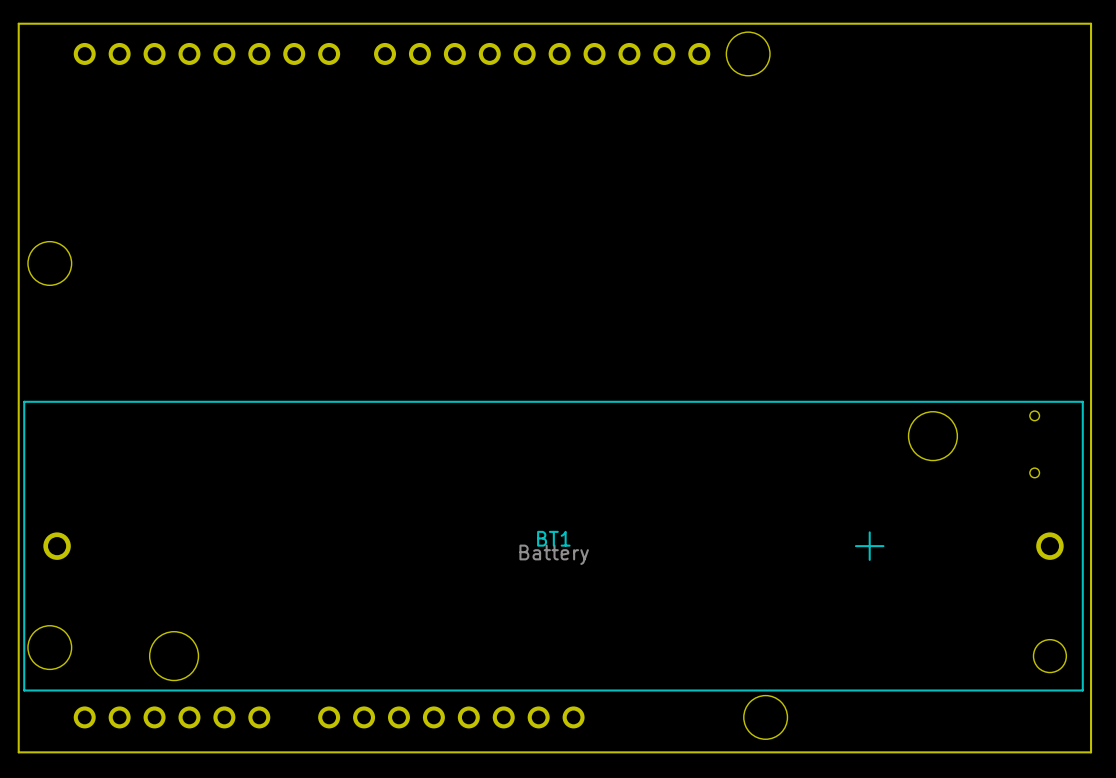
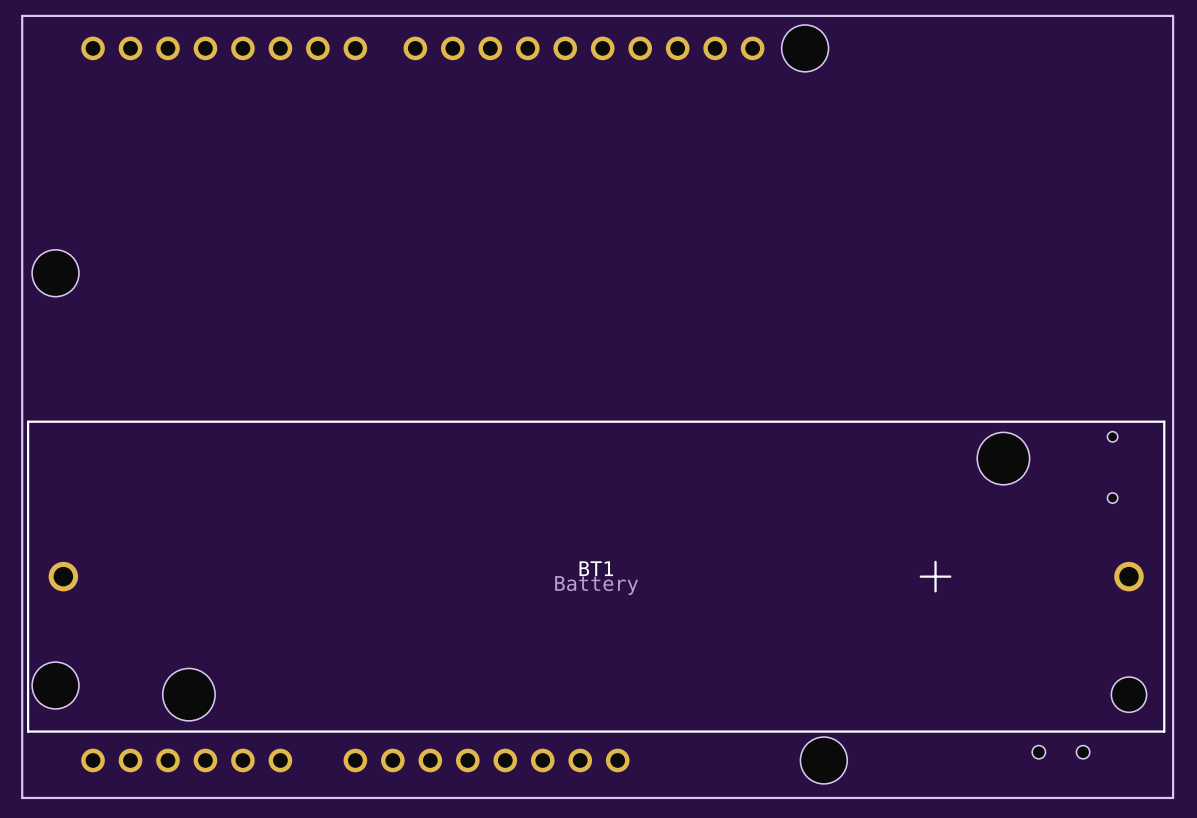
part: none -> (1060, 752)

